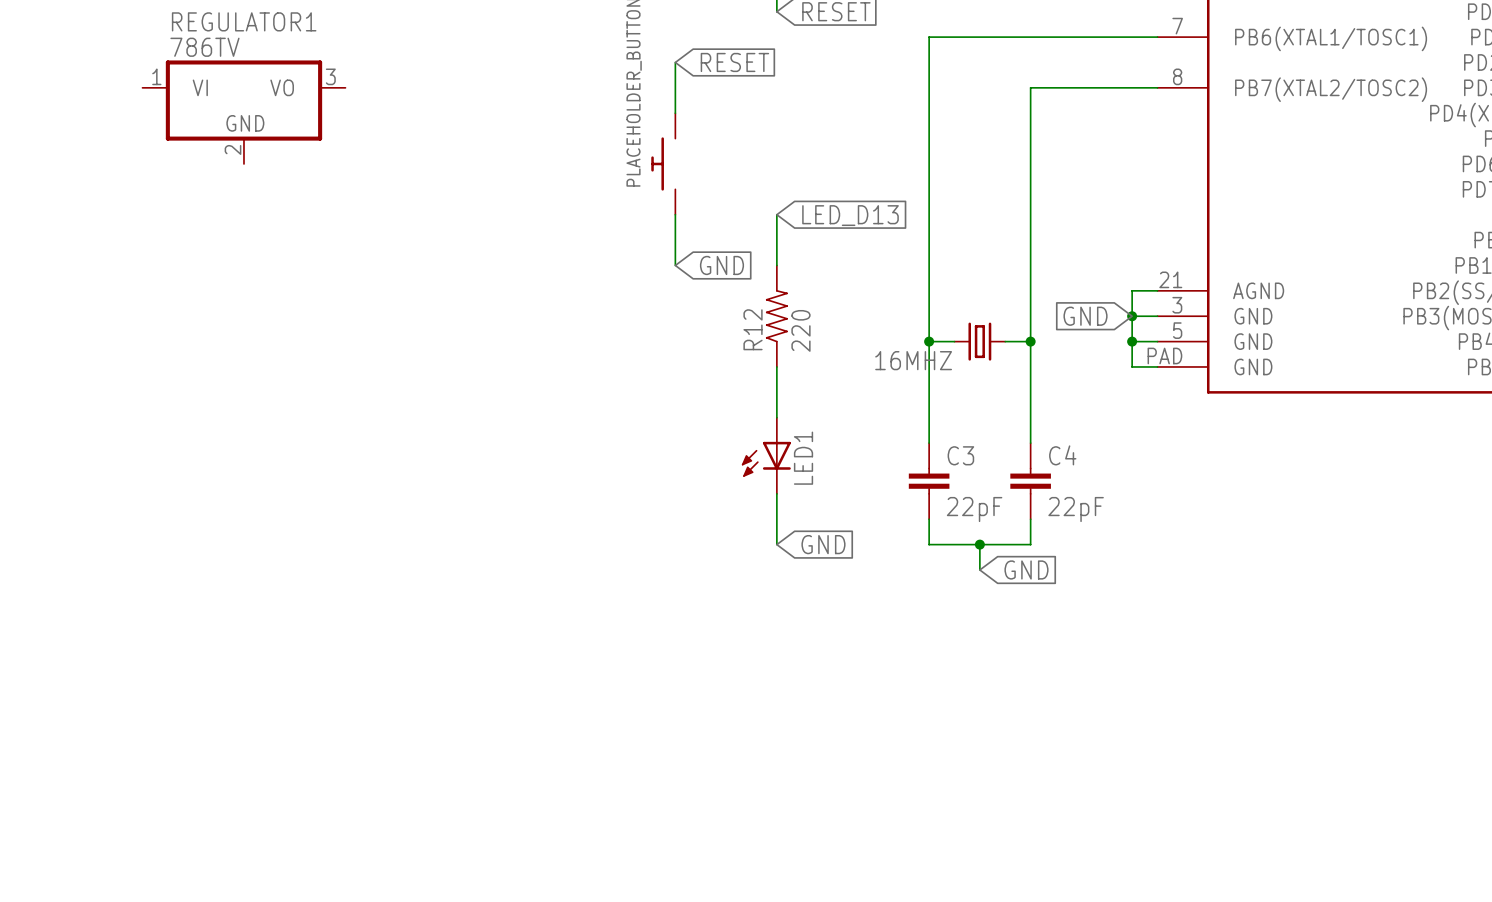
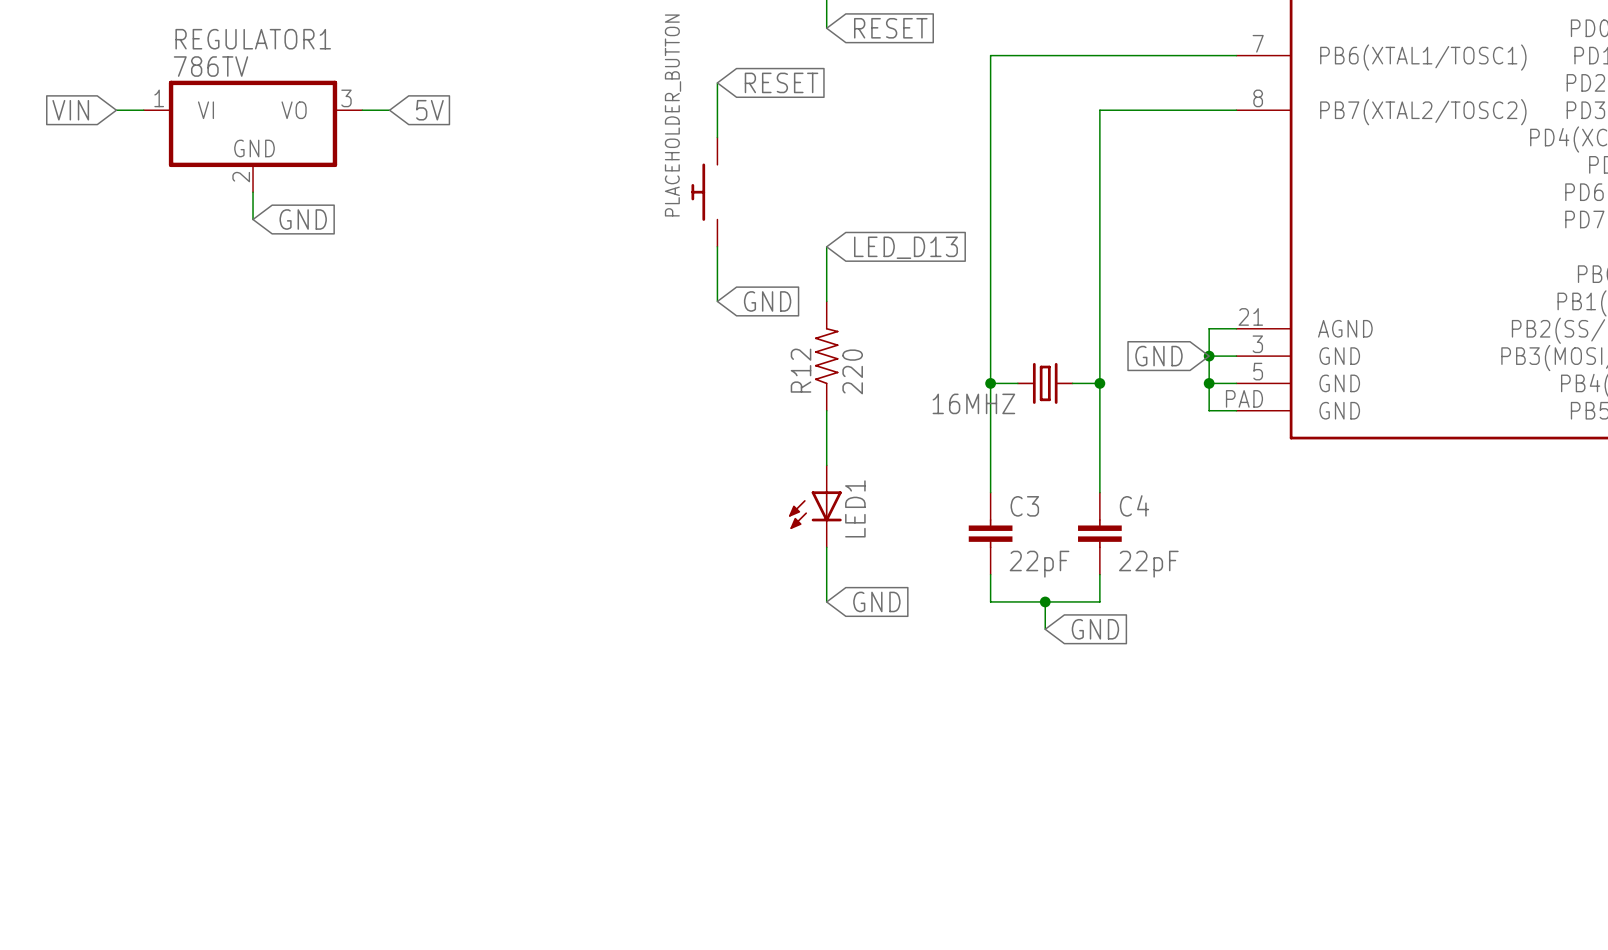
global label: none -> VIN (70, 110)
wire: none -> (116, 110) (143, 110)
wire: none -> (362, 110) (389, 110)
global label: none -> 5V (429, 110)
wire: none -> (253, 192) (253, 219)
global label: none -> GND (303, 219)

